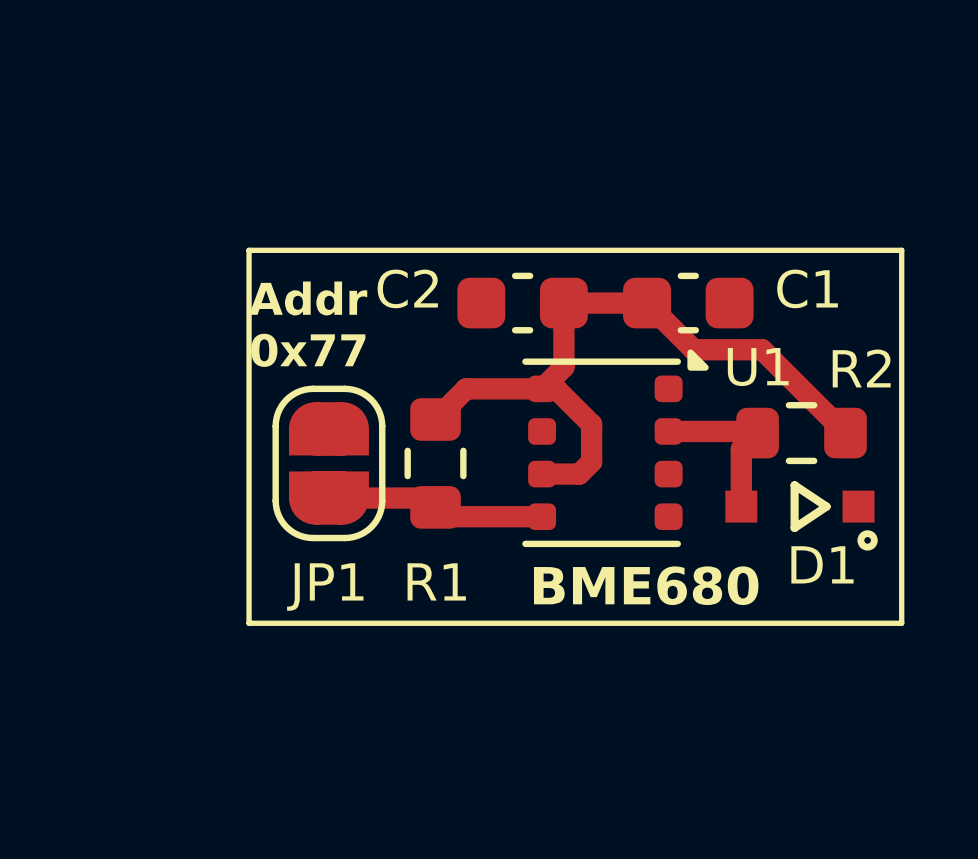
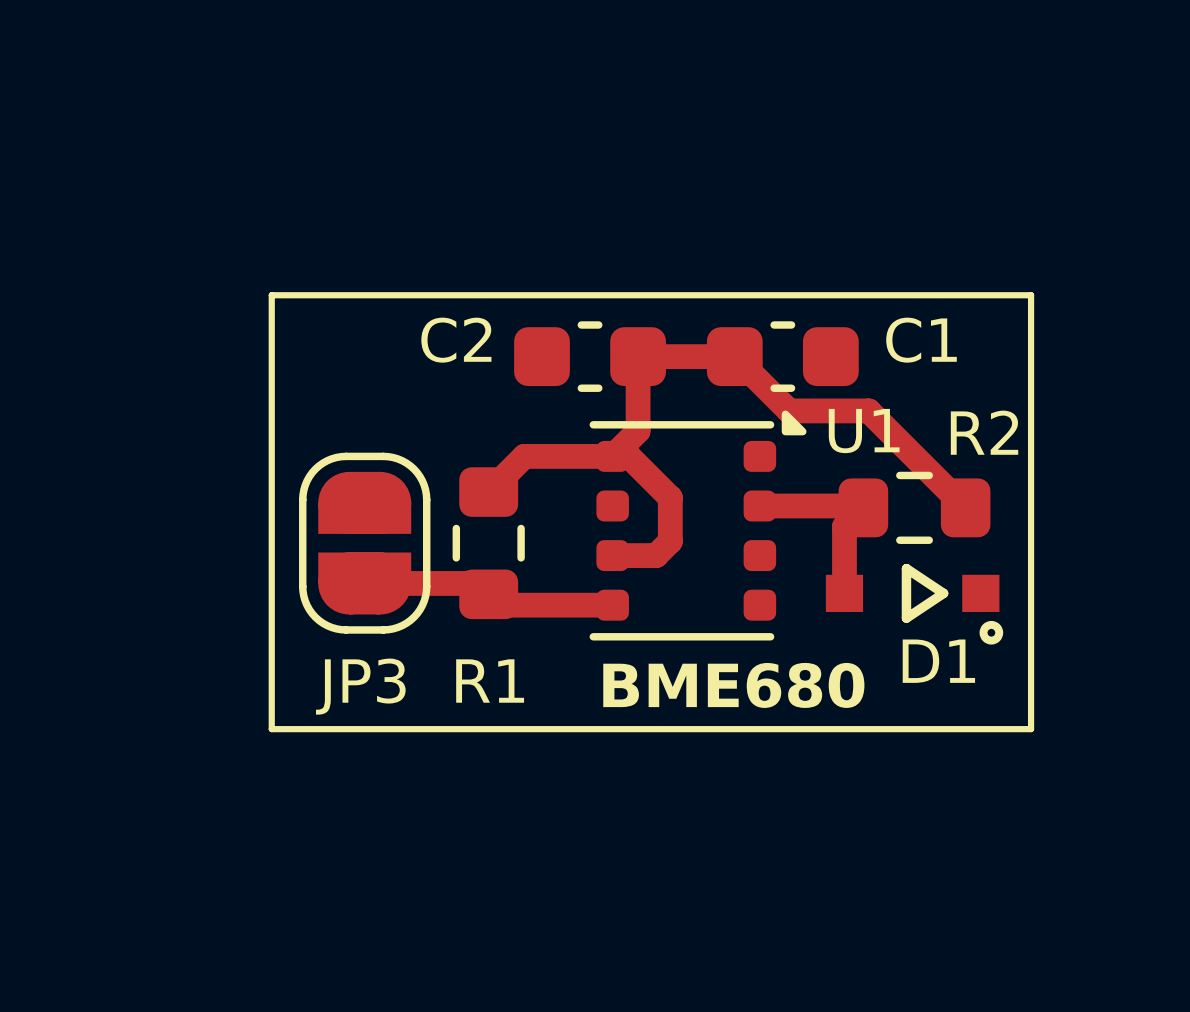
text: Addr (308, 298) -> none
text: 0x77 (308, 350) -> none
JP1 name: JP1 (325, 587) -> JP3 (360, 686)

